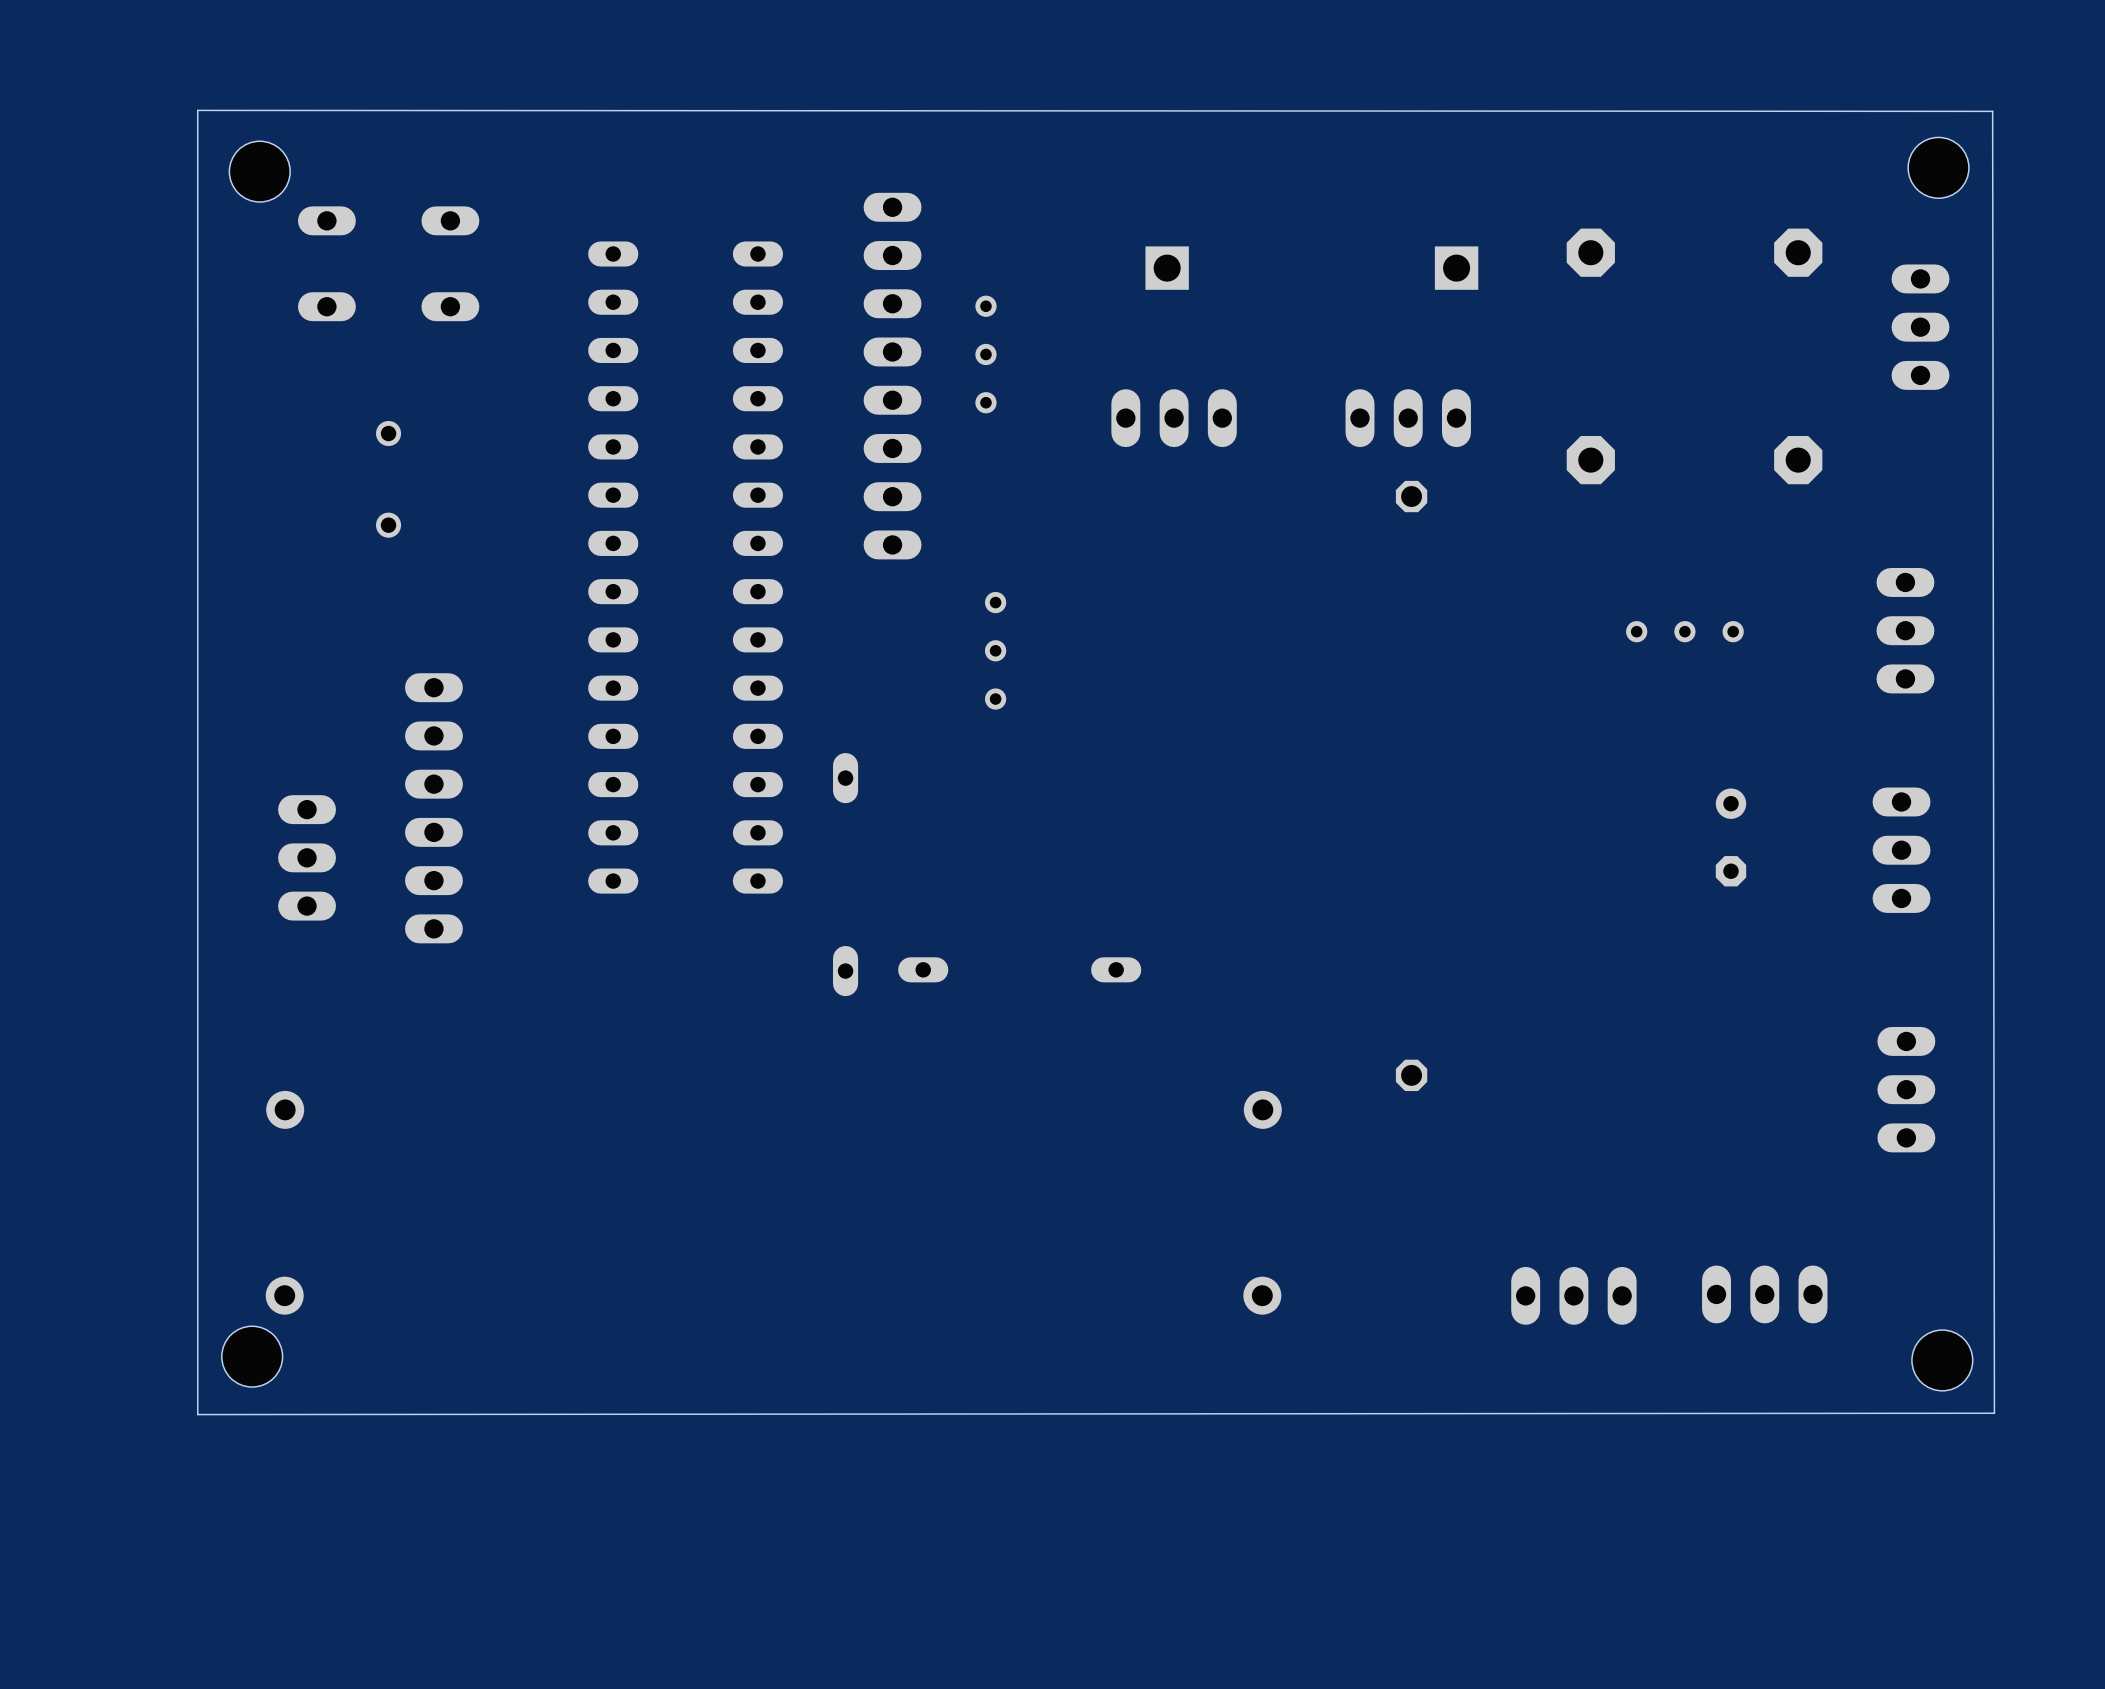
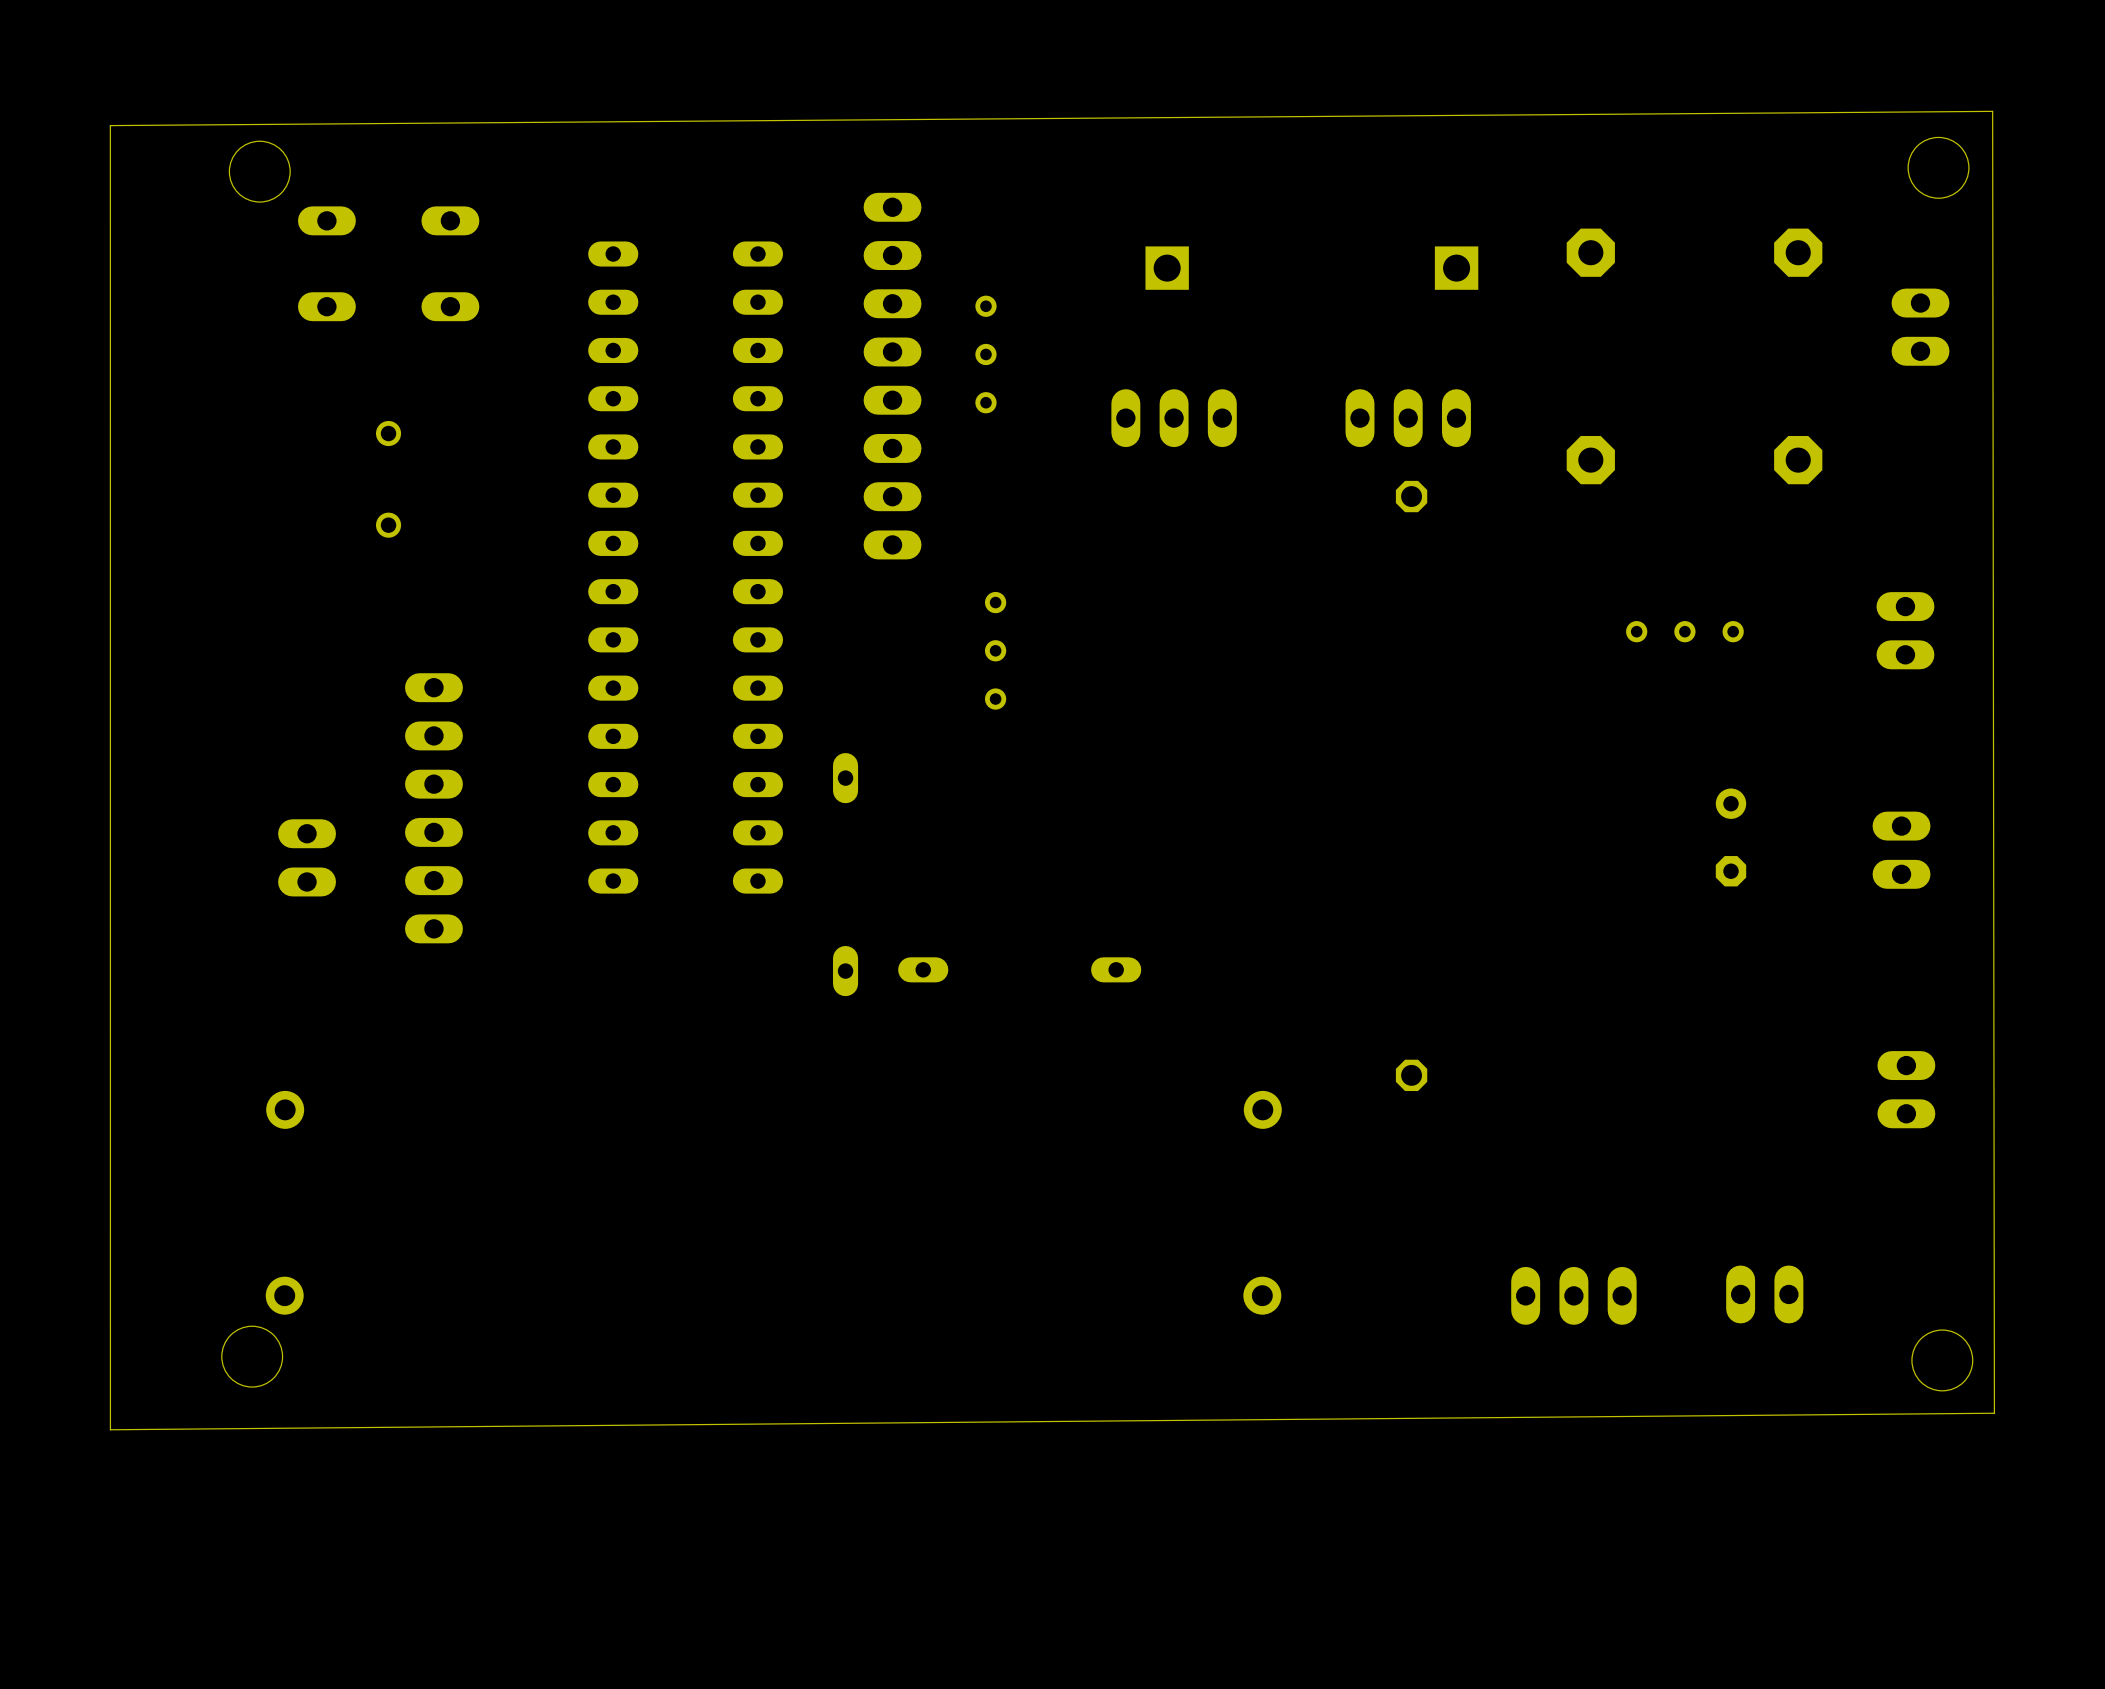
board edge: (1992, 111) (197, 110) (197, 1414) (1994, 1413) -> (1992, 111) (110, 125) (110, 1429) (1994, 1413)
part footprint: [1891, 264, 1950, 390] -> [1891, 288, 1950, 366]
part footprint: [1876, 567, 1935, 694] -> [1876, 592, 1935, 670]
part footprint: [1872, 787, 1931, 913] -> [1872, 811, 1931, 889]
part footprint: [278, 795, 336, 921] -> [278, 819, 336, 897]
part footprint: [1877, 1026, 1936, 1153] -> [1877, 1051, 1936, 1129]
part footprint: [1702, 1265, 1828, 1324] -> [1726, 1265, 1804, 1324]

